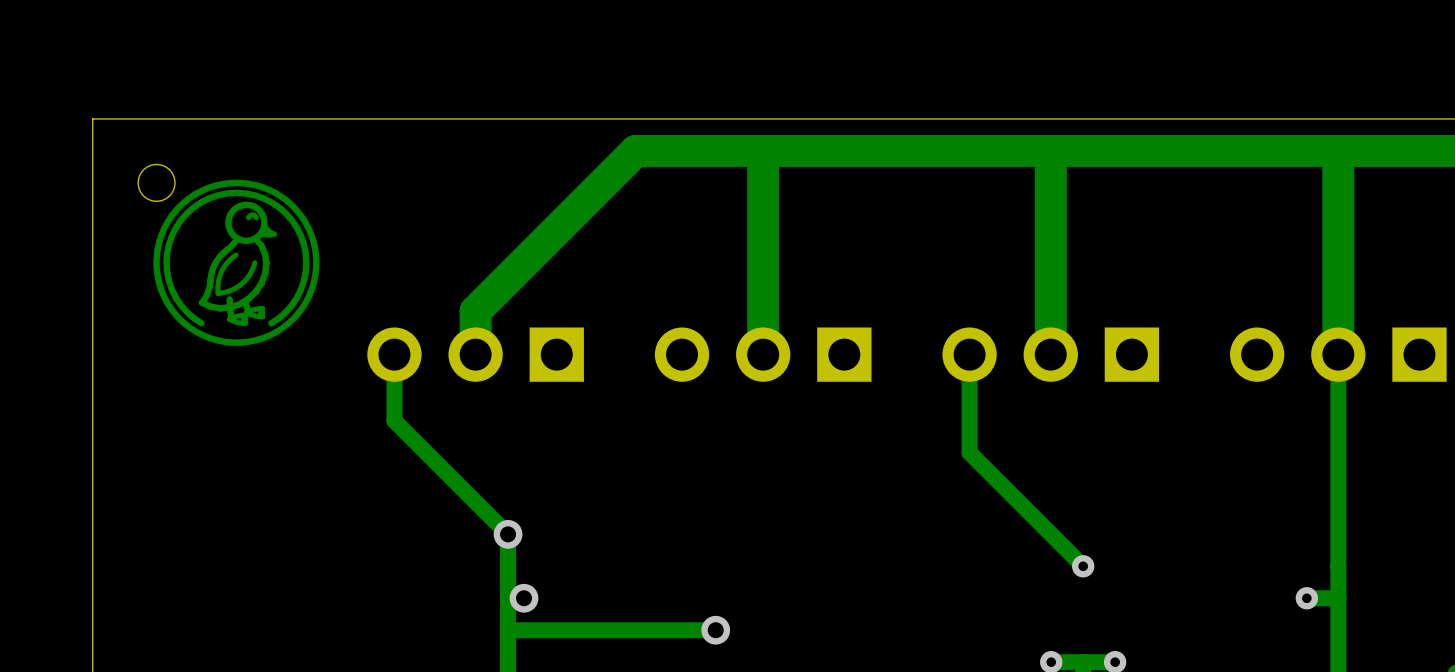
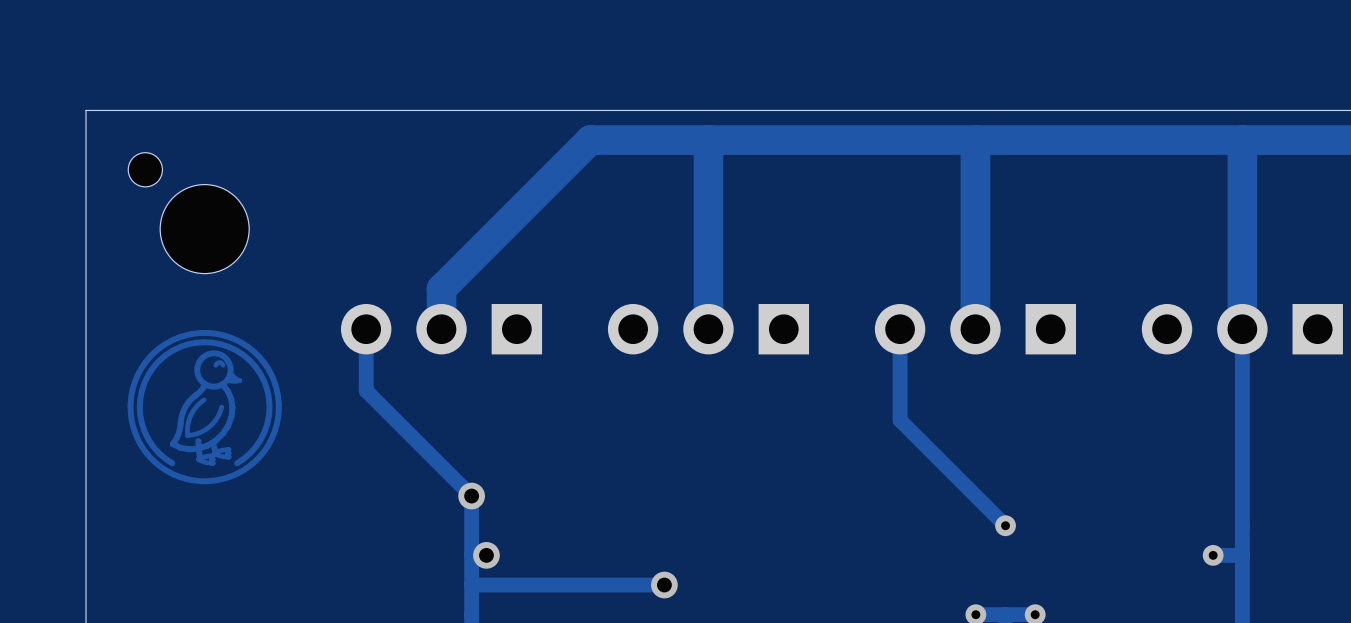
part: none -> (204, 229)
drawing position: (236, 262) -> (204, 407)

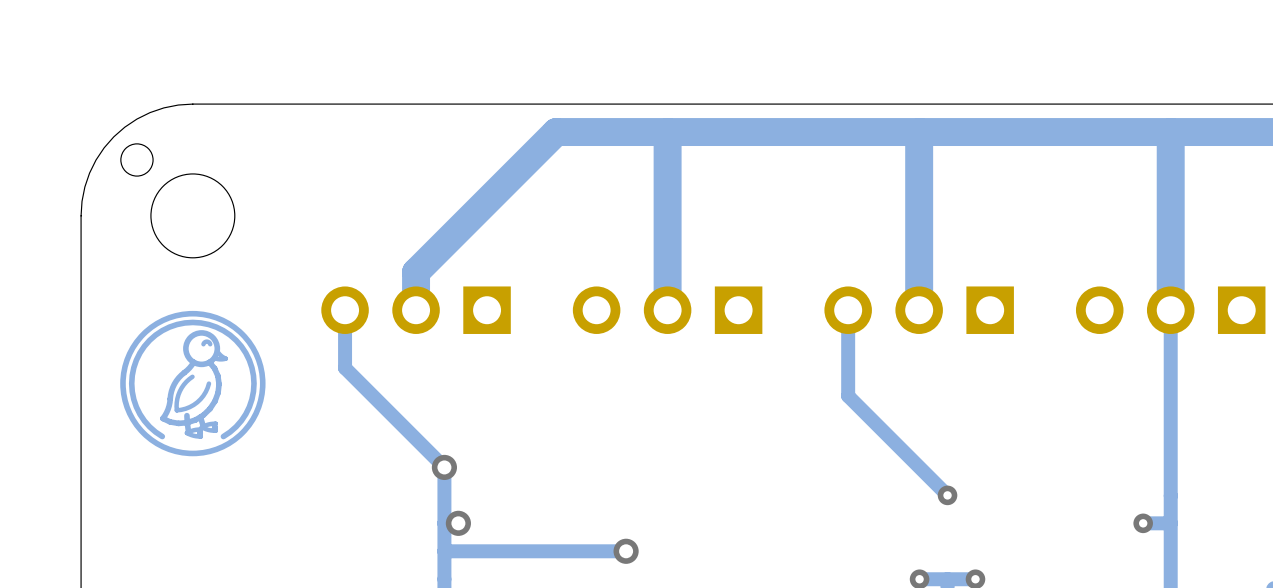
board edge: (204, 110) (86, 110) (86, 229) -> (192, 104) (178, 105) (150, 112) (136, 119) (113, 136) (96, 159) (89, 173) (82, 201) (81, 215)

